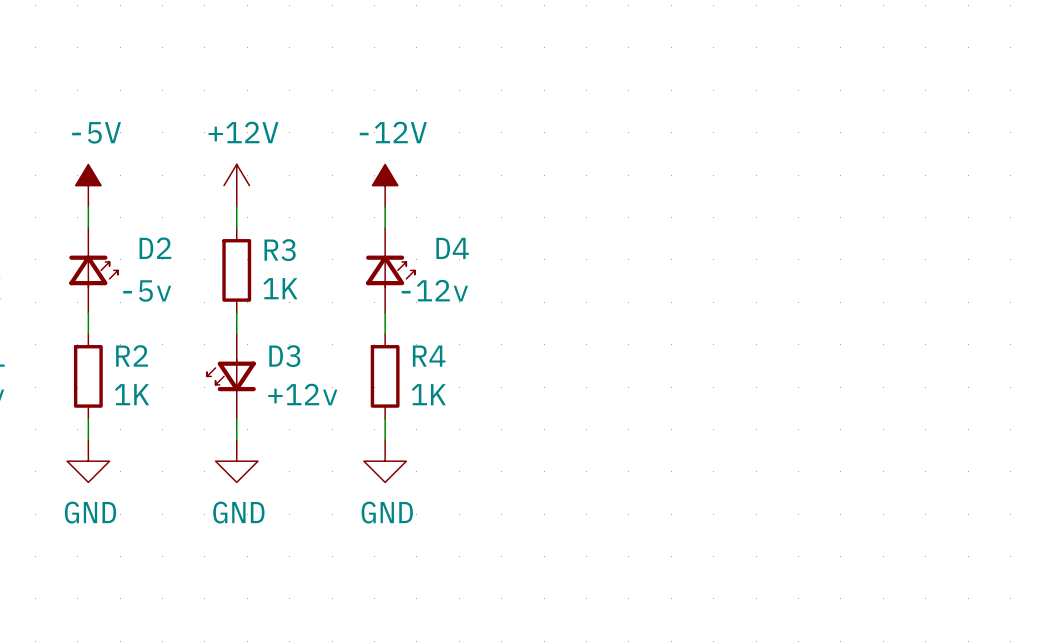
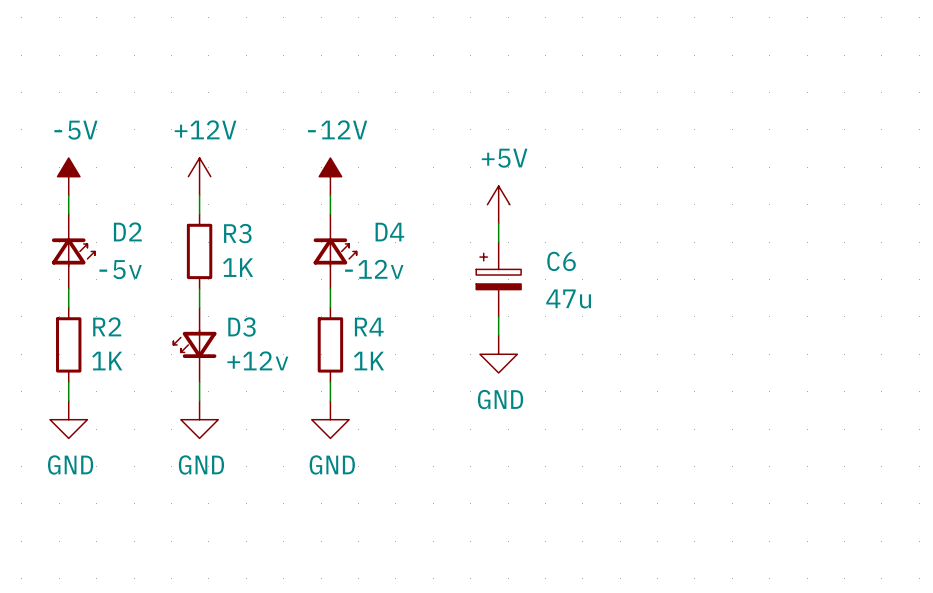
power symbol: none -> +5V (498, 204)
wire: none -> (498, 223) (498, 242)
C6: none -> 47u (498, 279)
wire: none -> (498, 316) (498, 335)
power symbol: none -> GND (498, 354)

